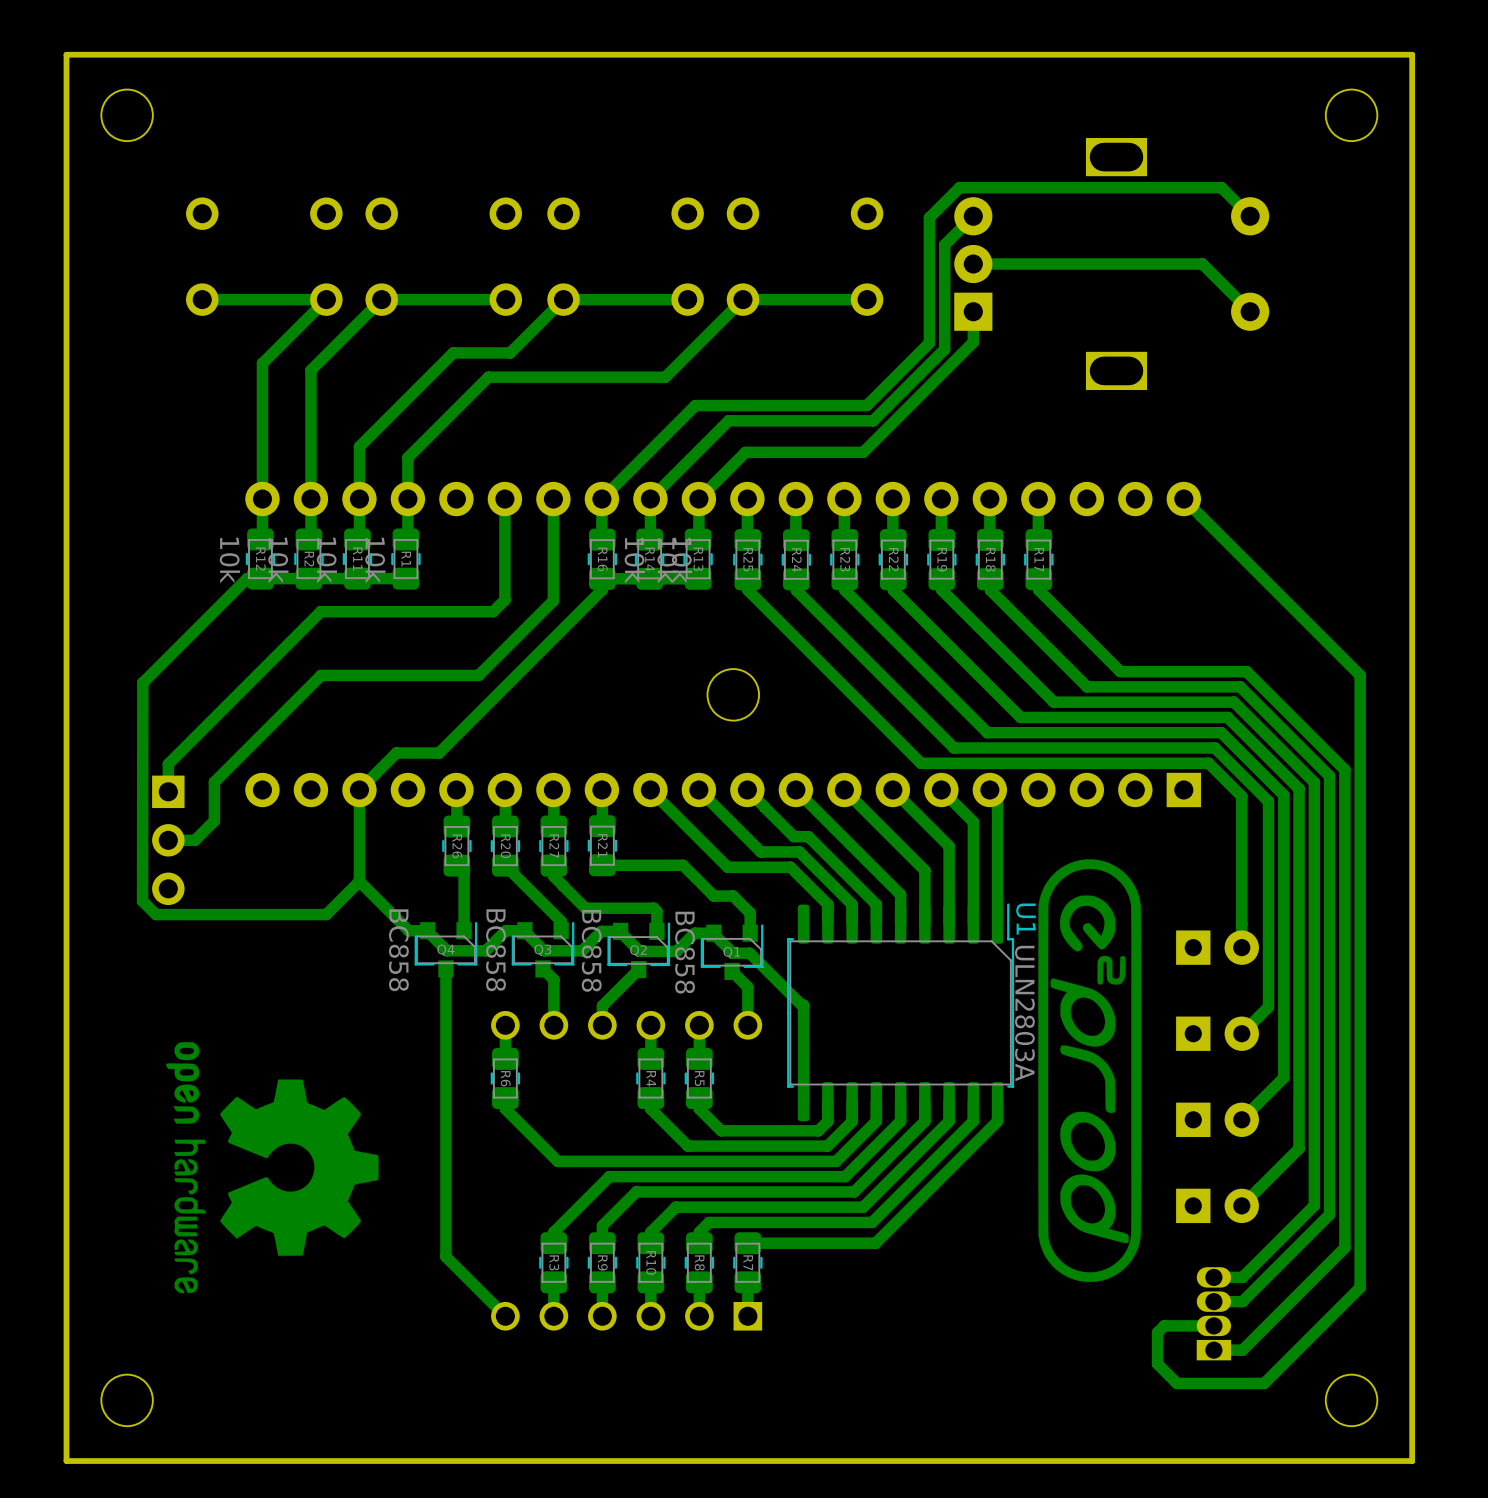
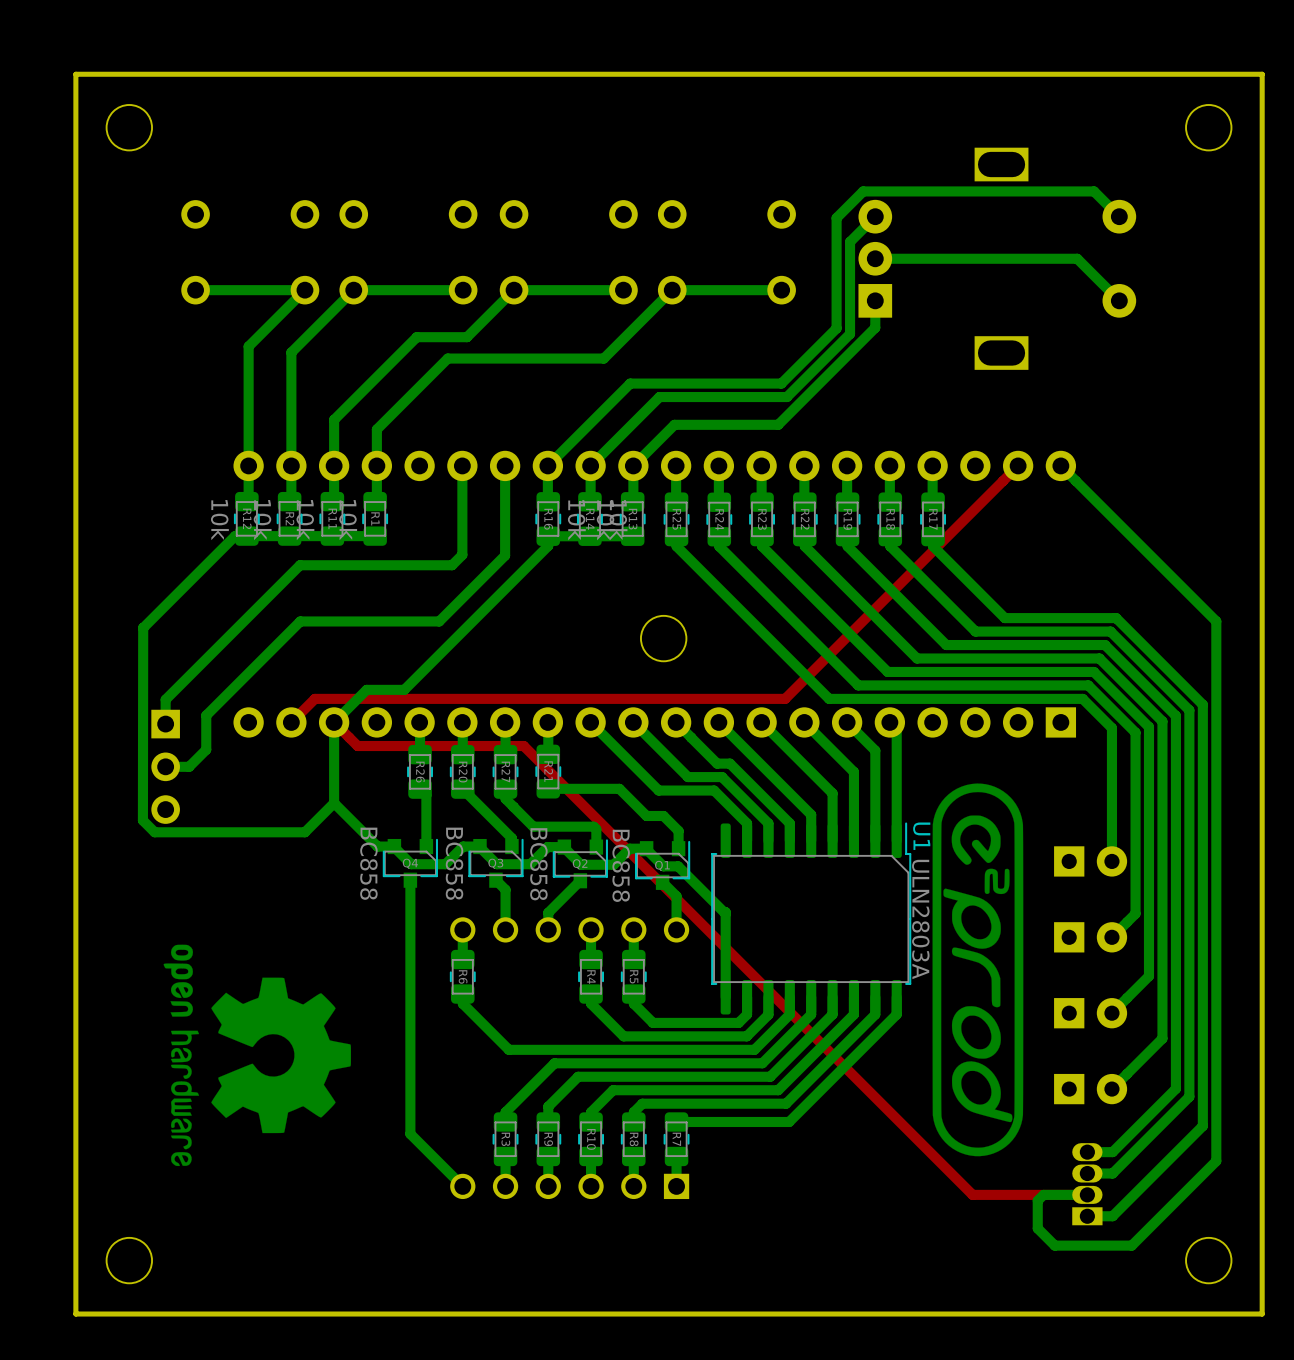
top track: none -> (1018, 465) (785, 698) (314, 698) (291, 722)
top track: none -> (334, 722) (357, 746) (523, 746) (972, 1194) (1087, 1194)

